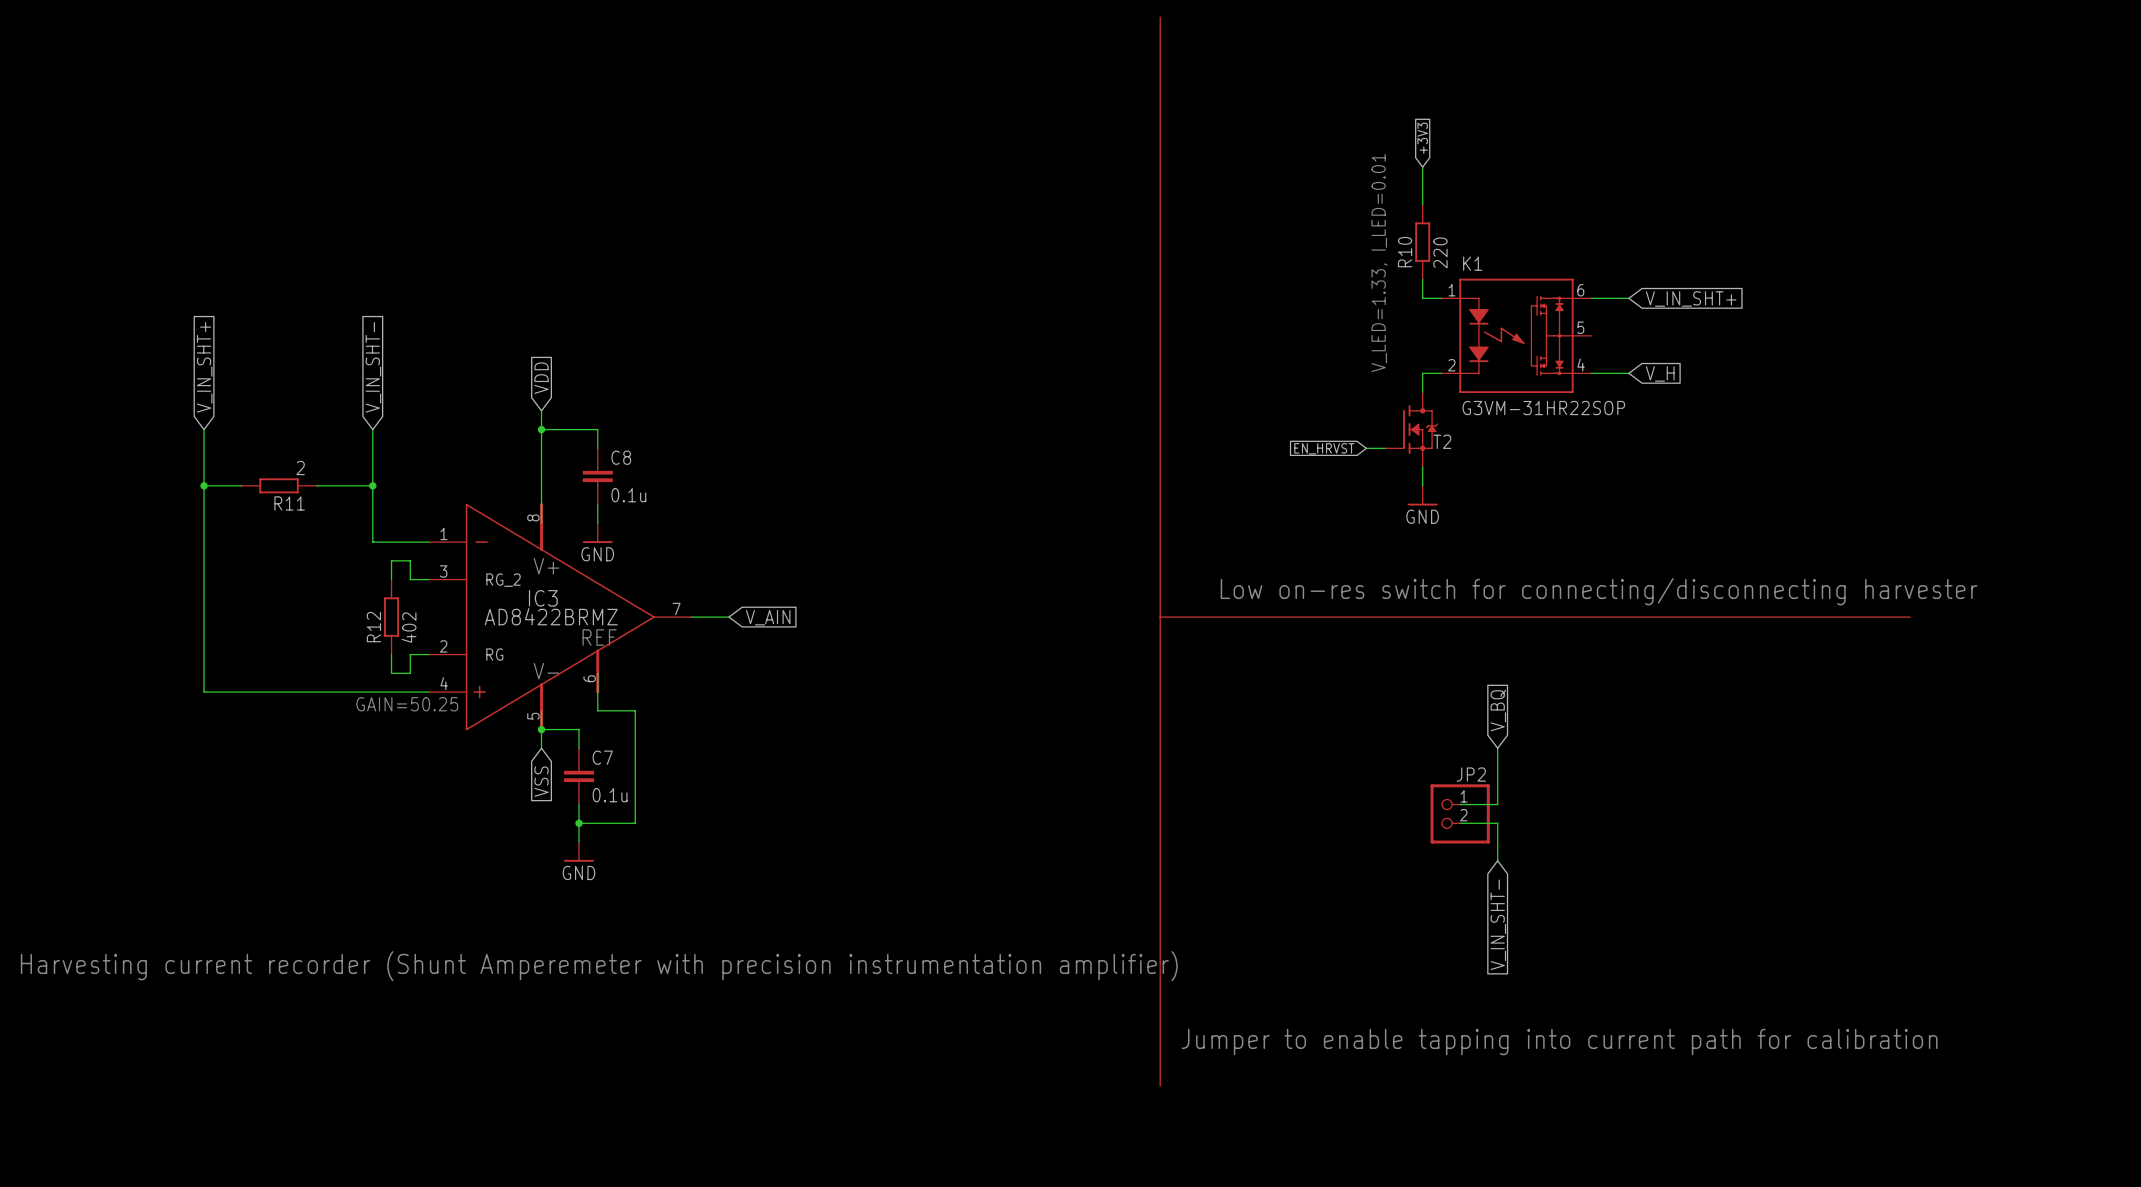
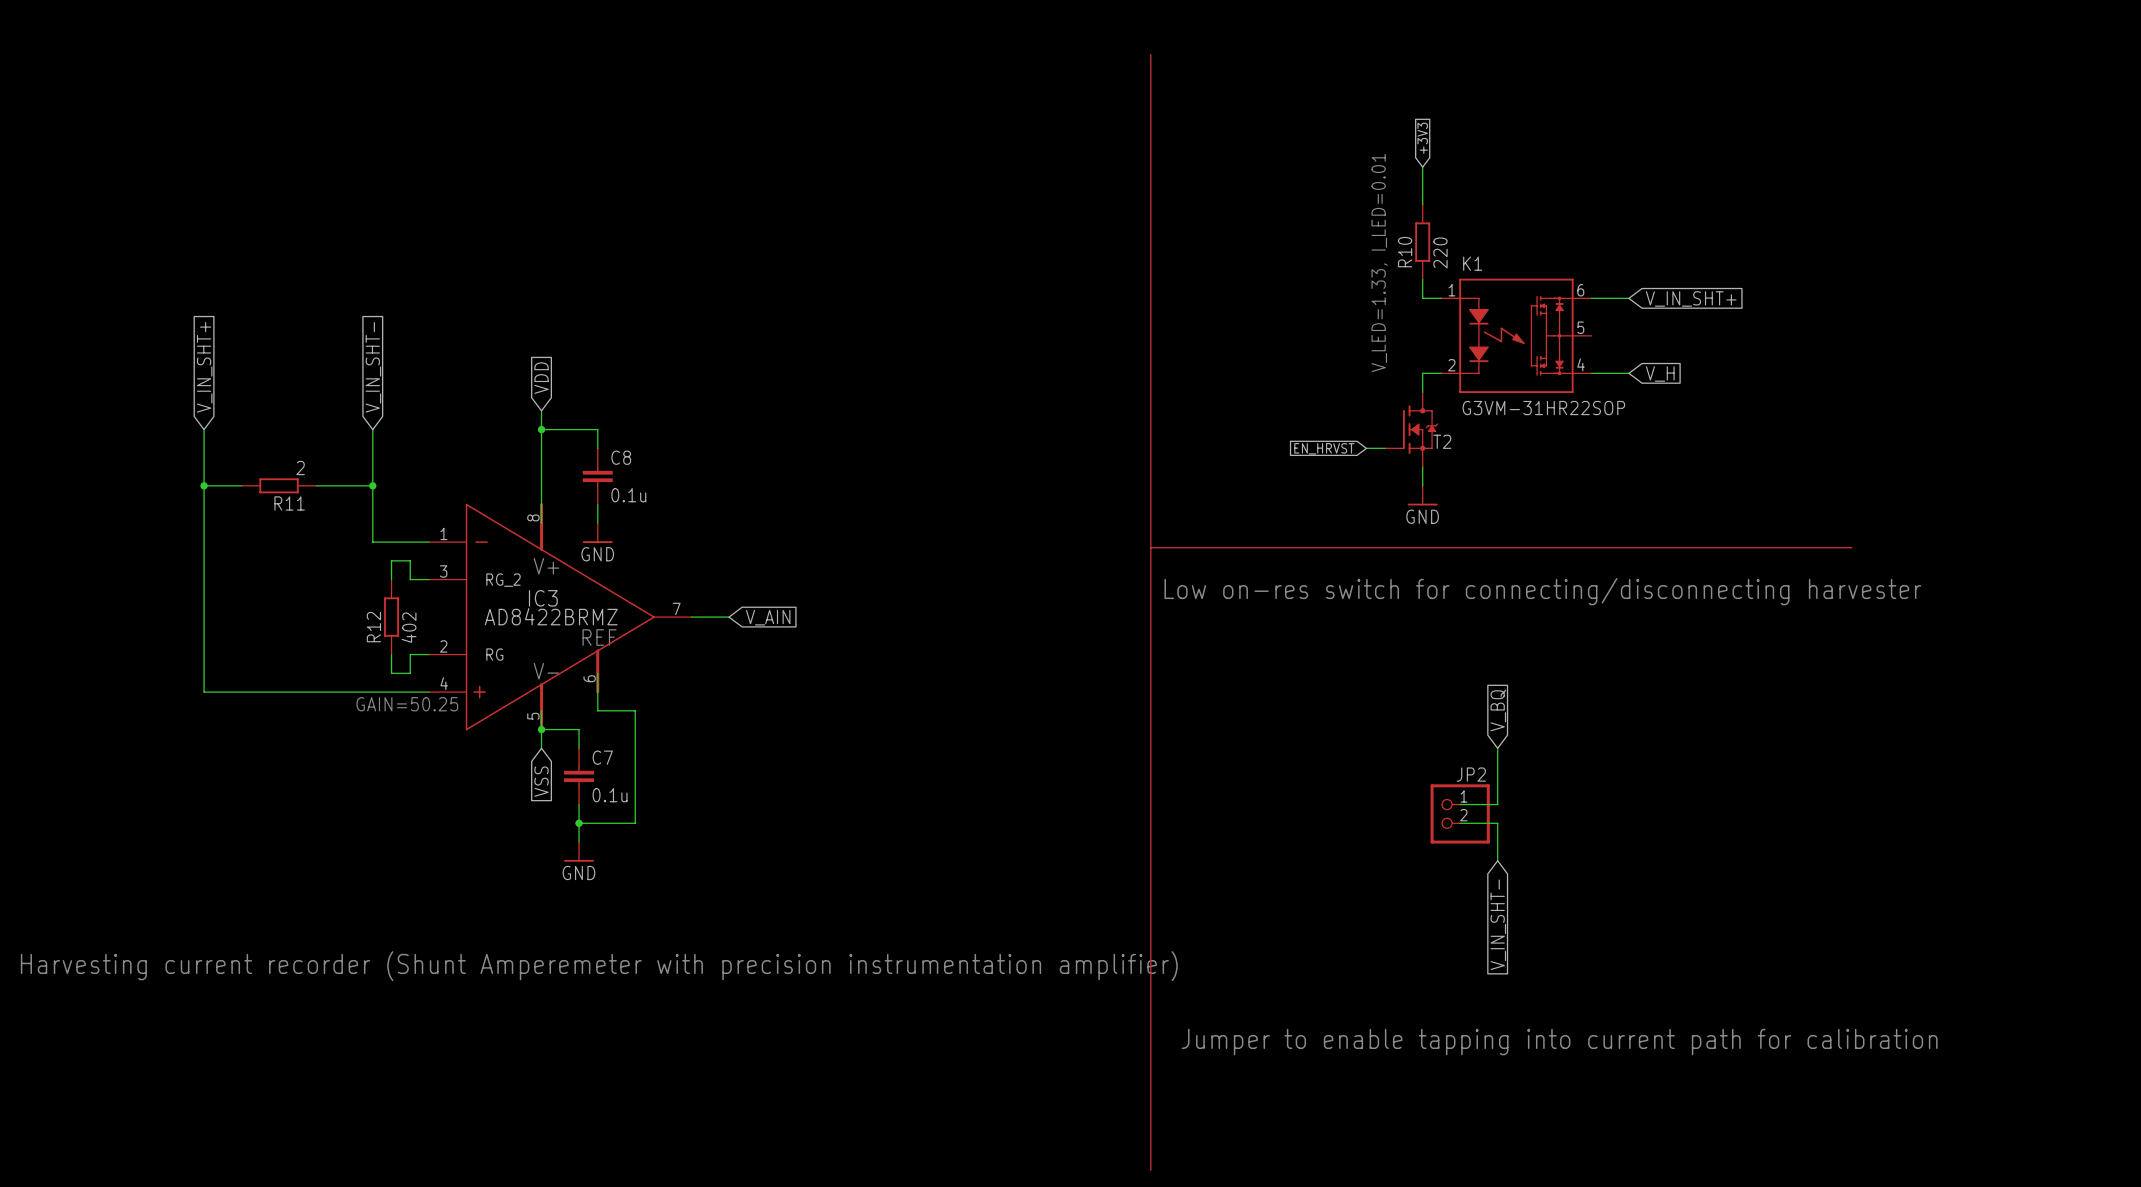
line: (1160, 17) (1160, 1085) -> none
line: none -> (1150, 54) (1150, 1170)
line: none -> (1150, 547) (1852, 547)
text position: Low on-res switch for connecting/disconnecting harvester (1599, 591) -> Low on-res switch for connecting/disconnecting harvester (1542, 591)
line: (1160, 617) (1910, 617) -> none

